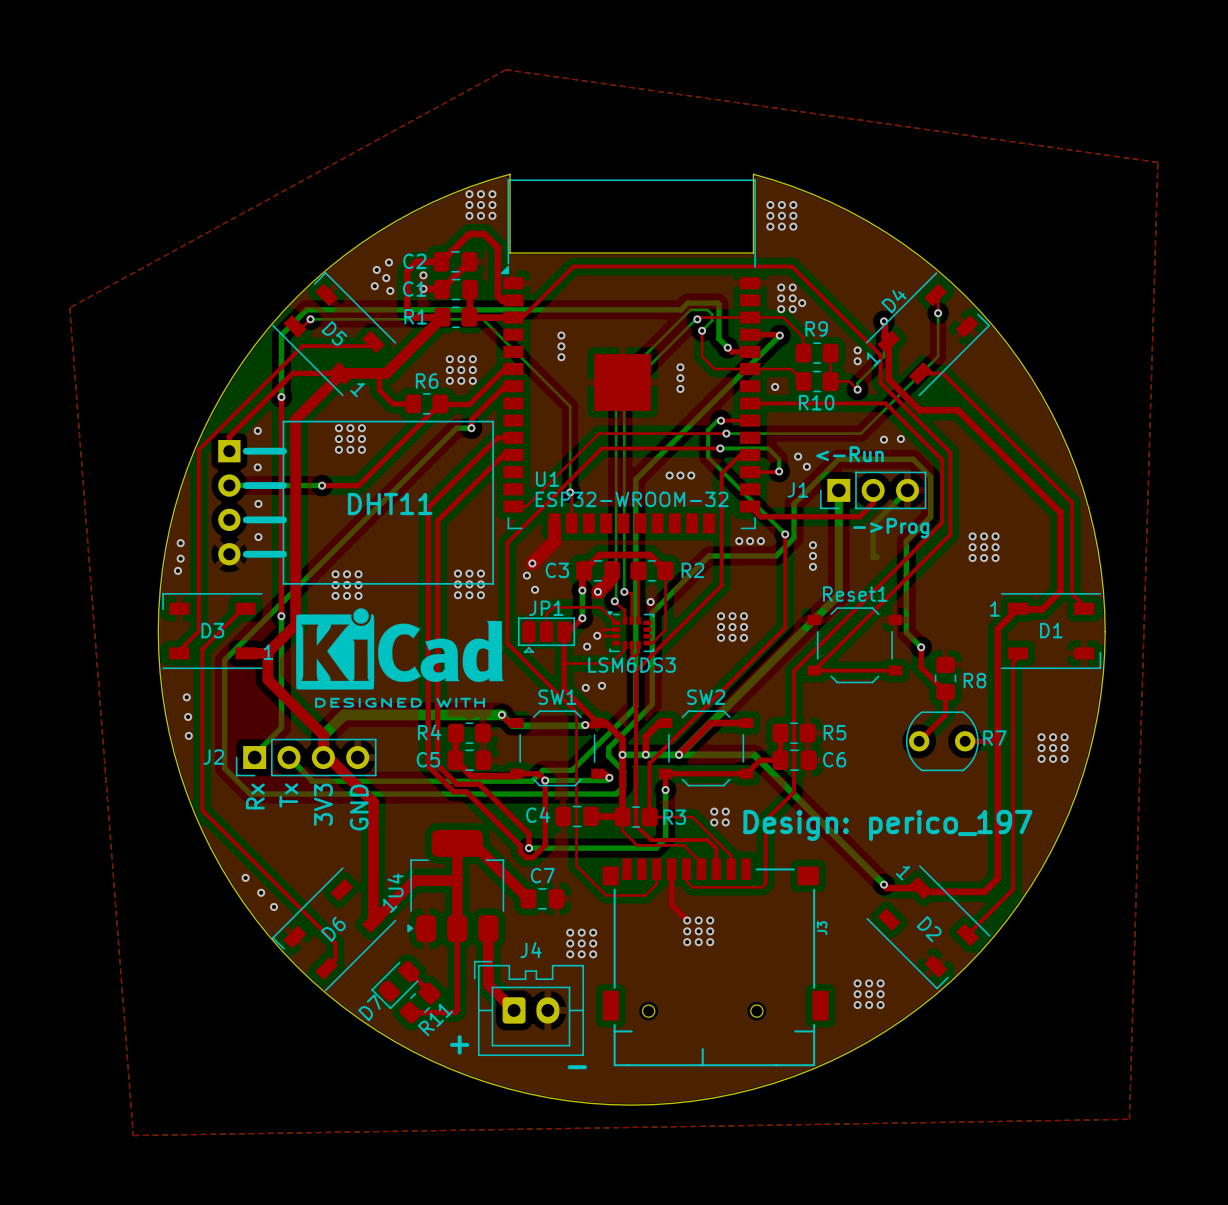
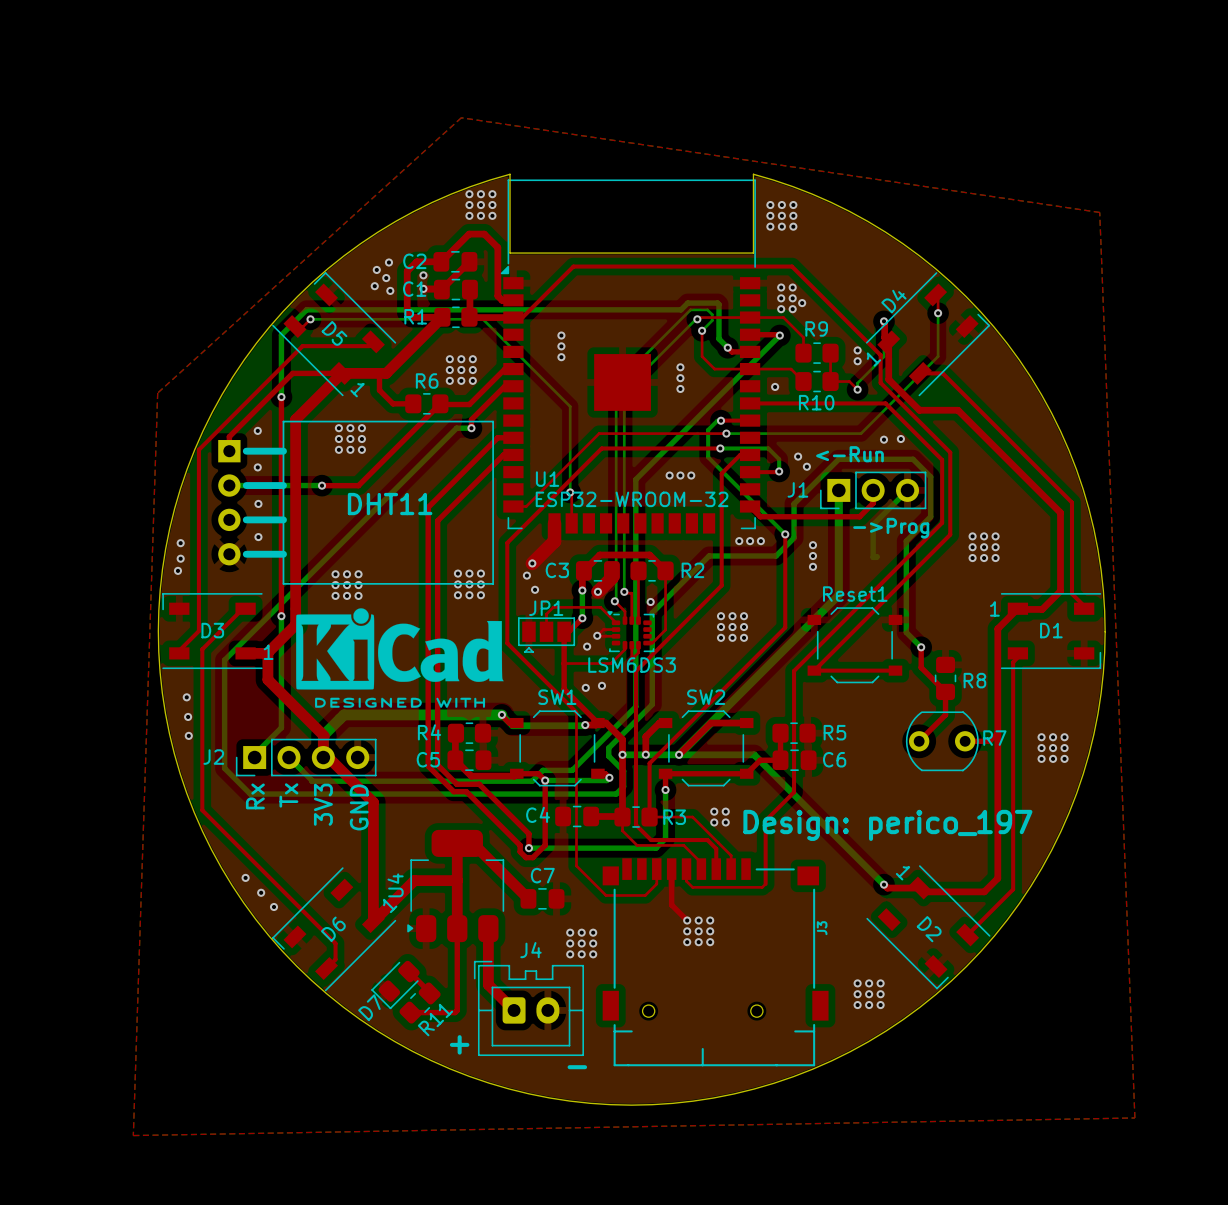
top zone outline: (505, 69) (1157, 162) (1129, 1119) (133, 1135) (69, 307) (505, 69) -> (461, 117) (157, 393) (133, 1135) (1134, 1117) (1099, 212) (461, 117)

